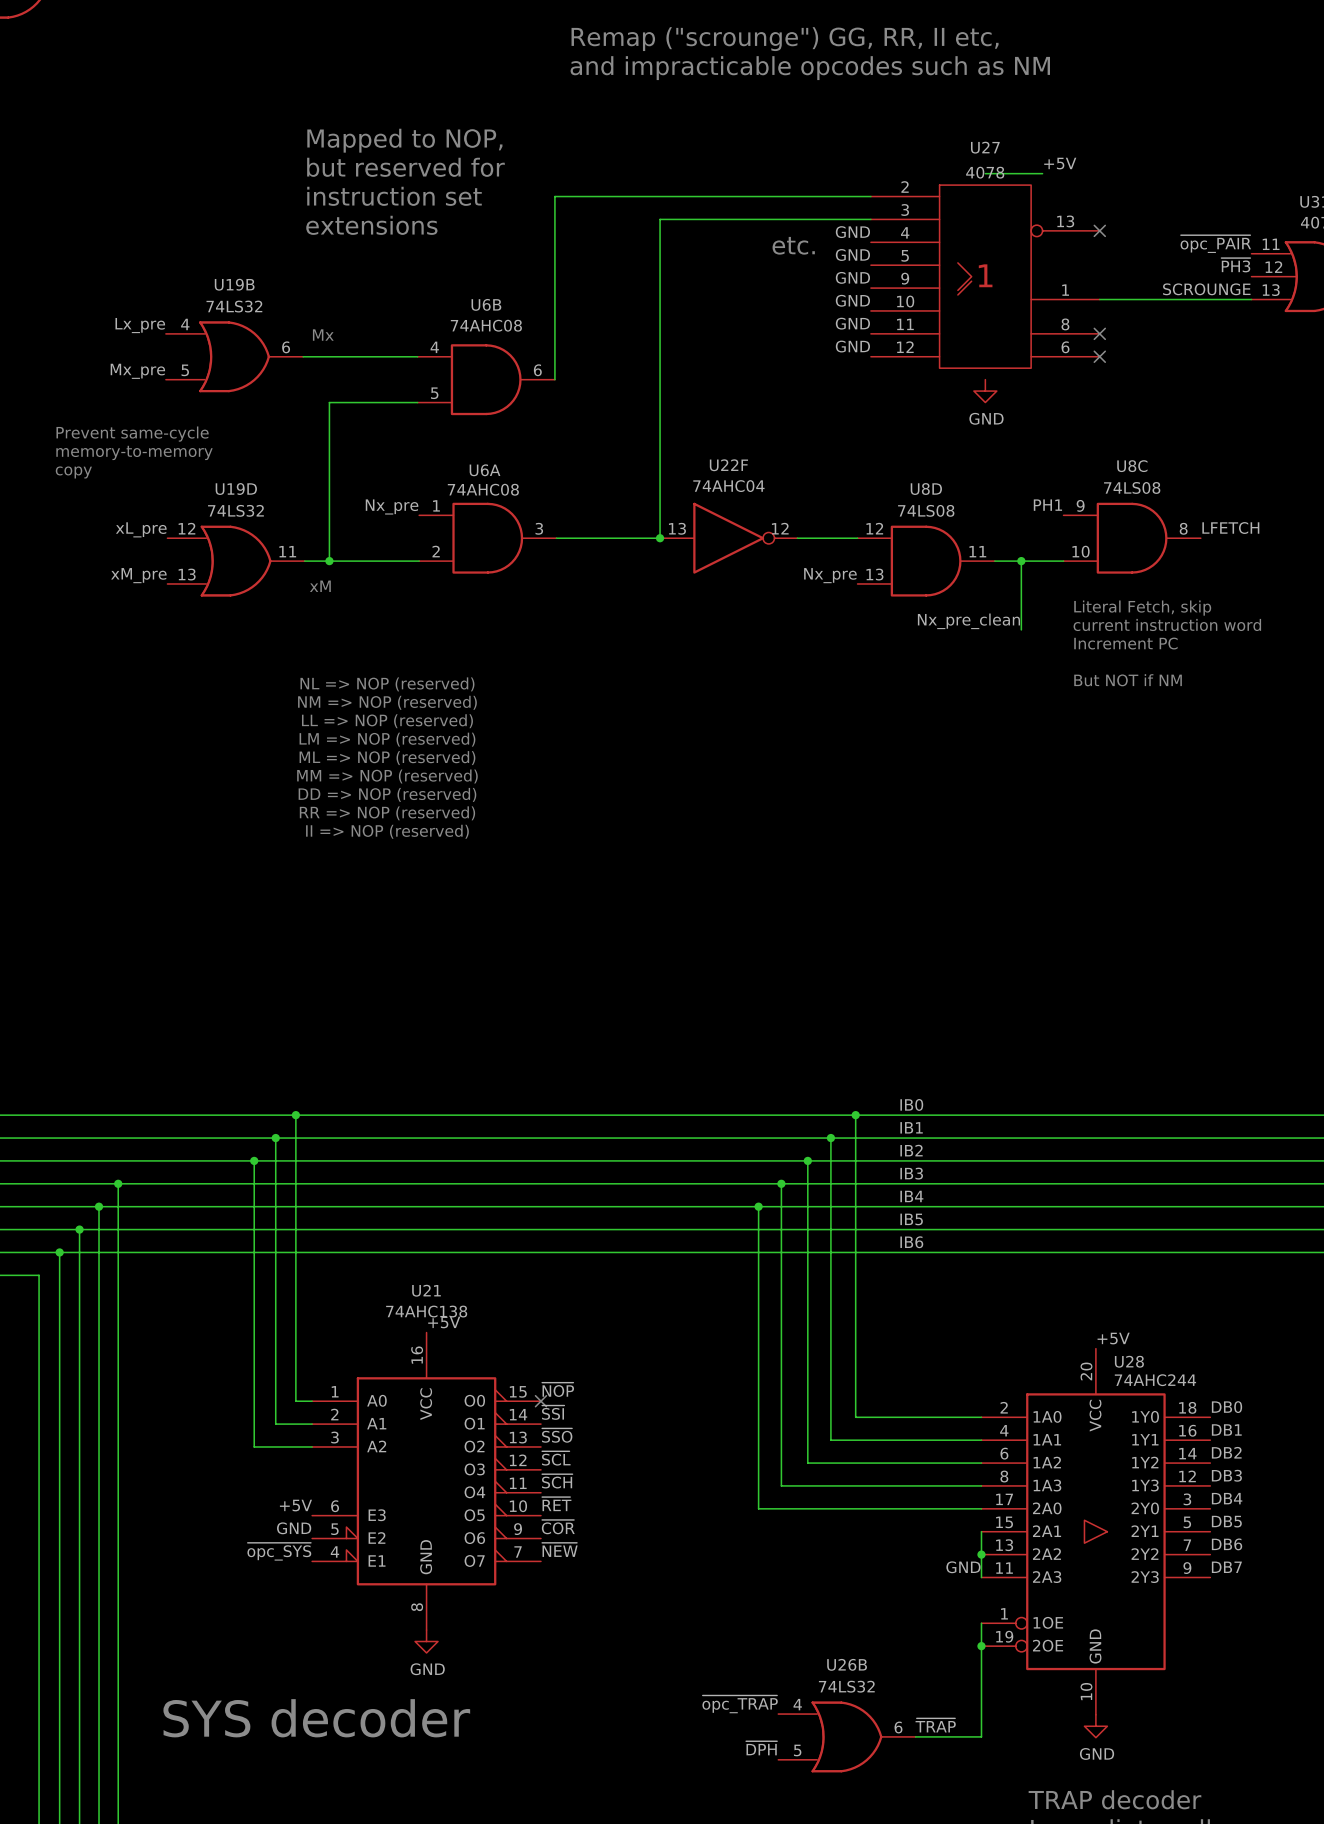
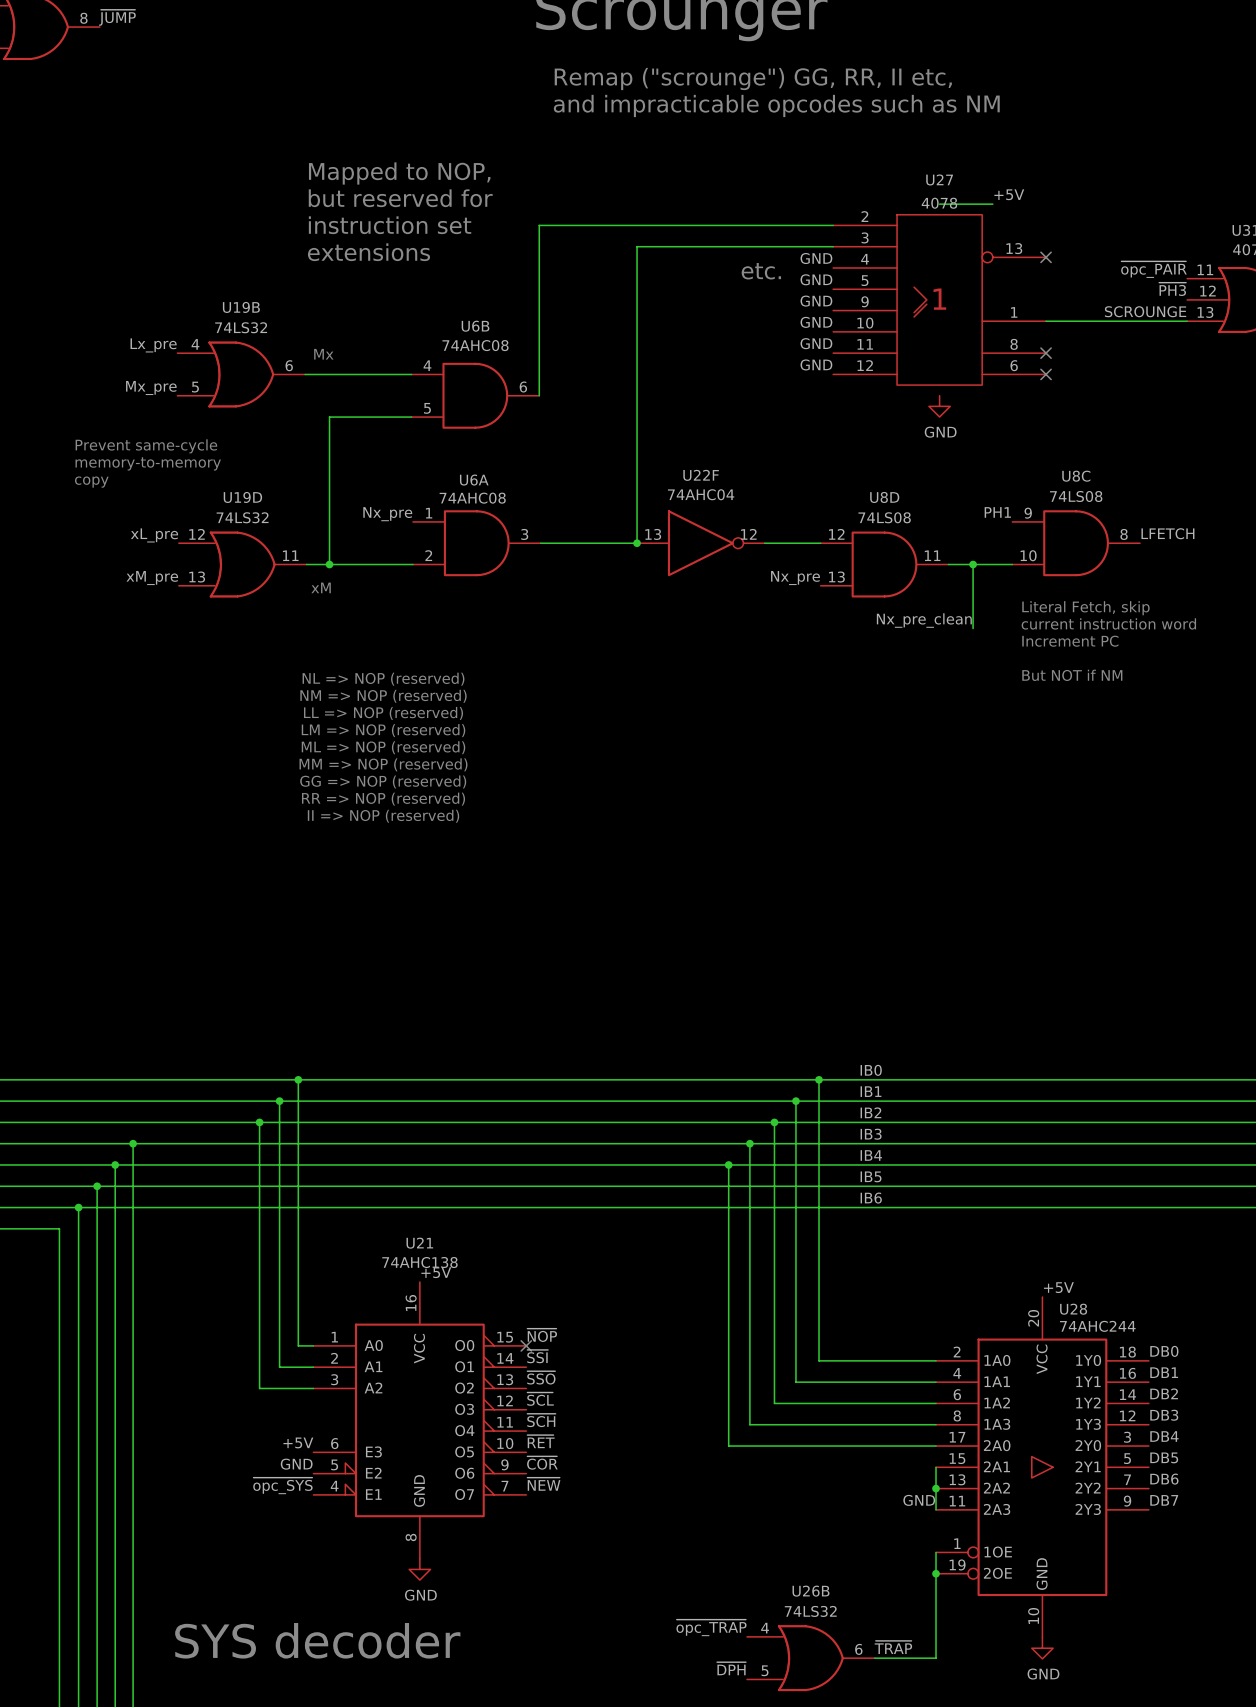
text: DD => NOP (reserved) (387, 794) -> GG => NOP (reserved) (383, 781)

